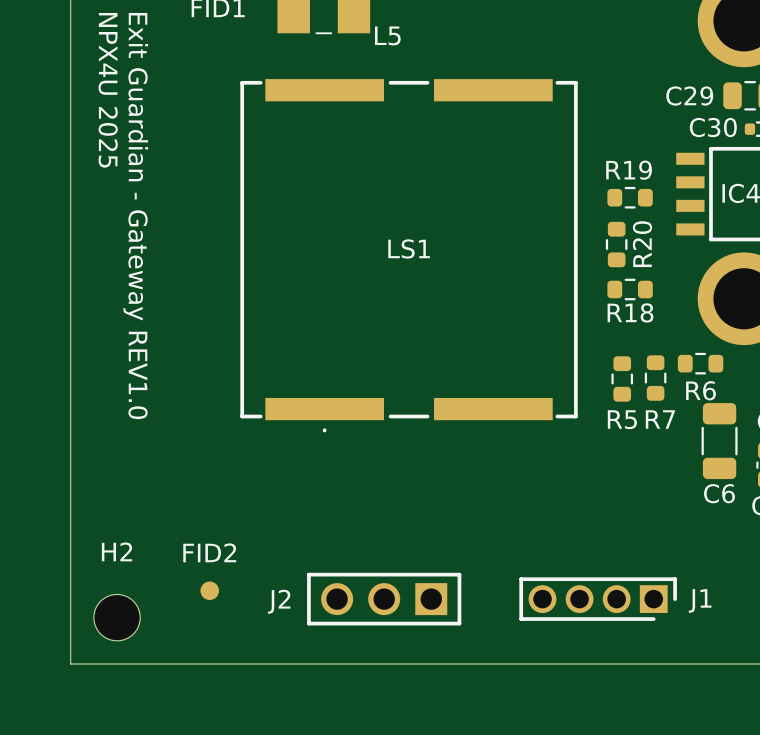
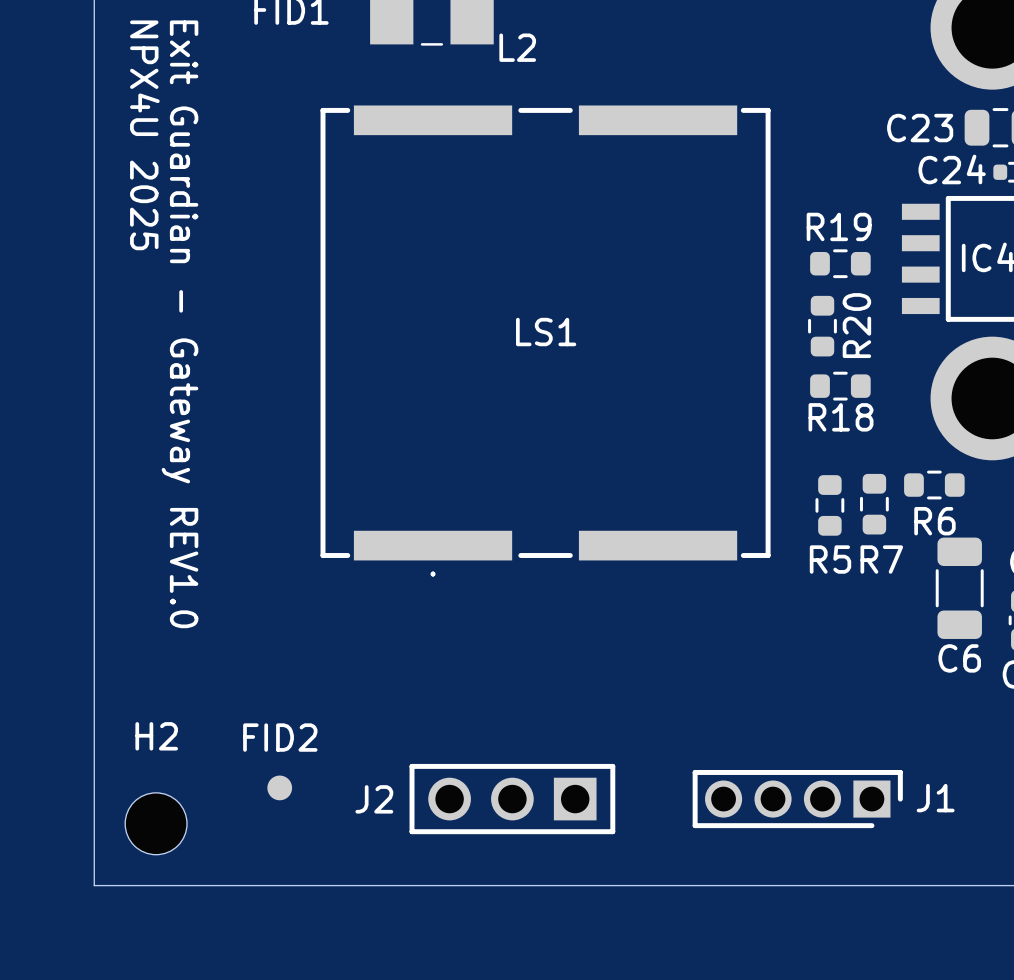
L5 name: L5 (387, 35) -> L2 (517, 47)
C29 name: C29 (689, 96) -> C23 (920, 128)
C30 name: C30 (713, 127) -> C24 (952, 169)

